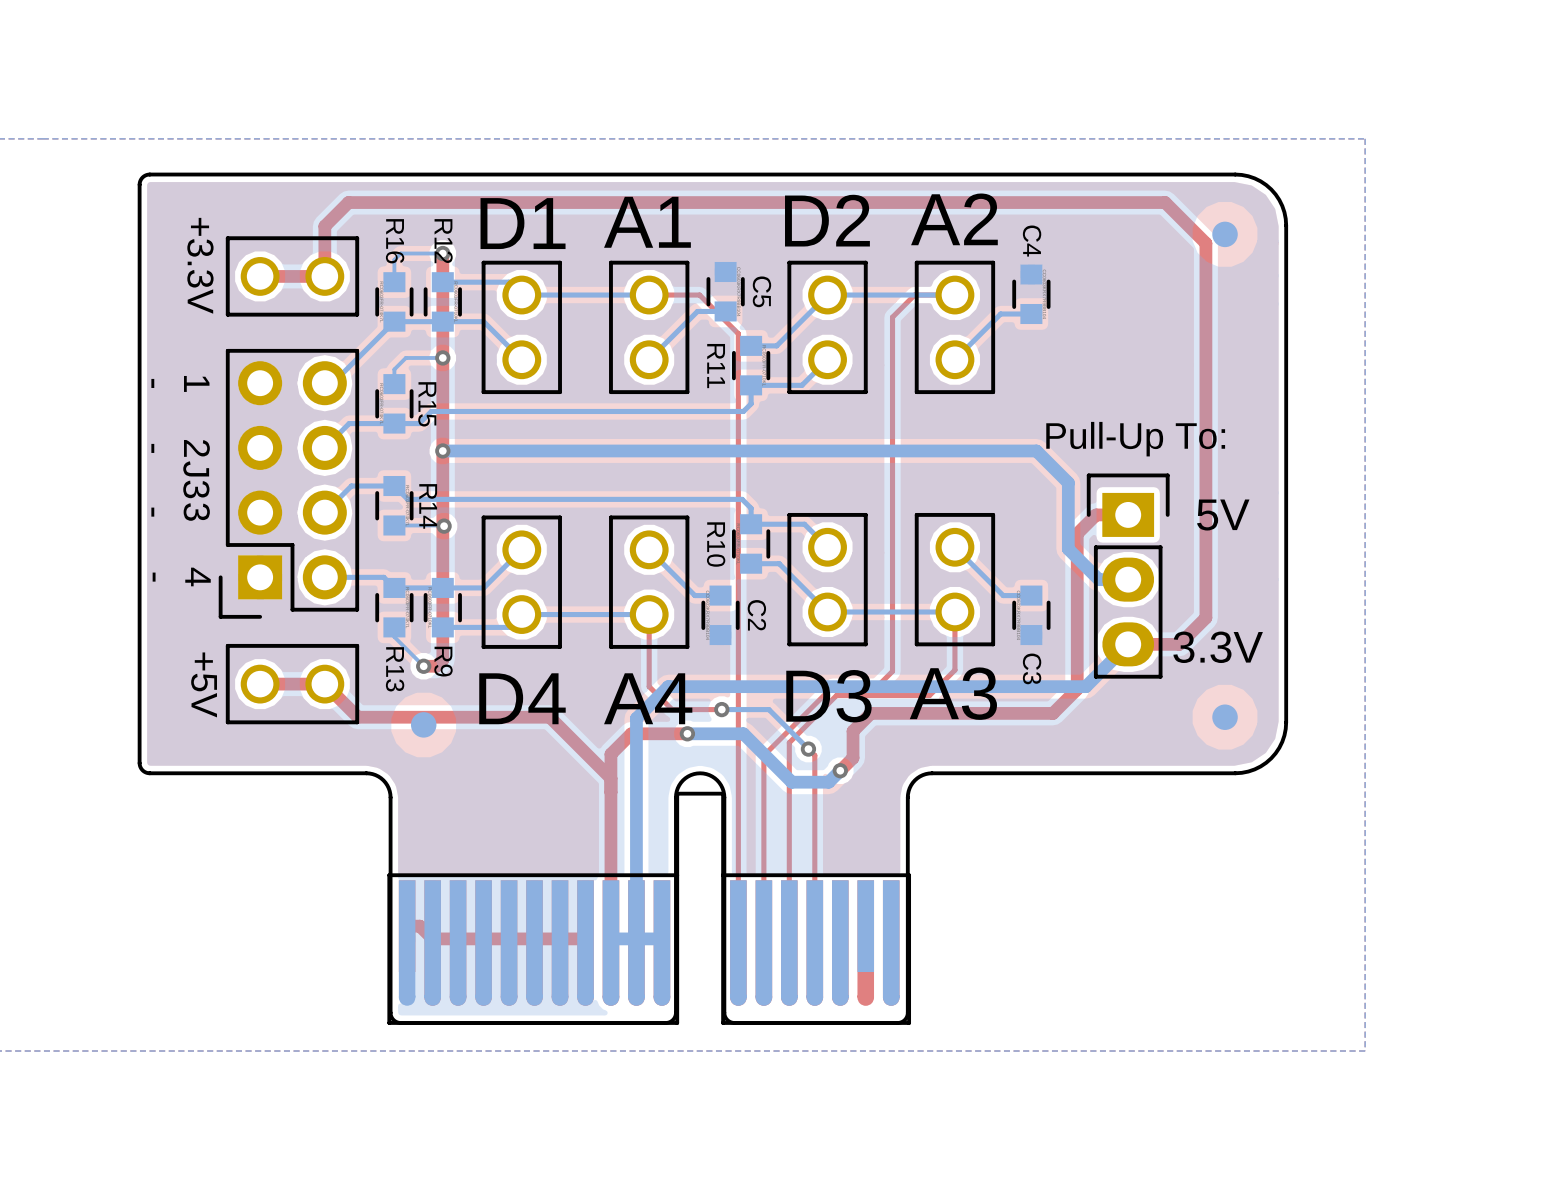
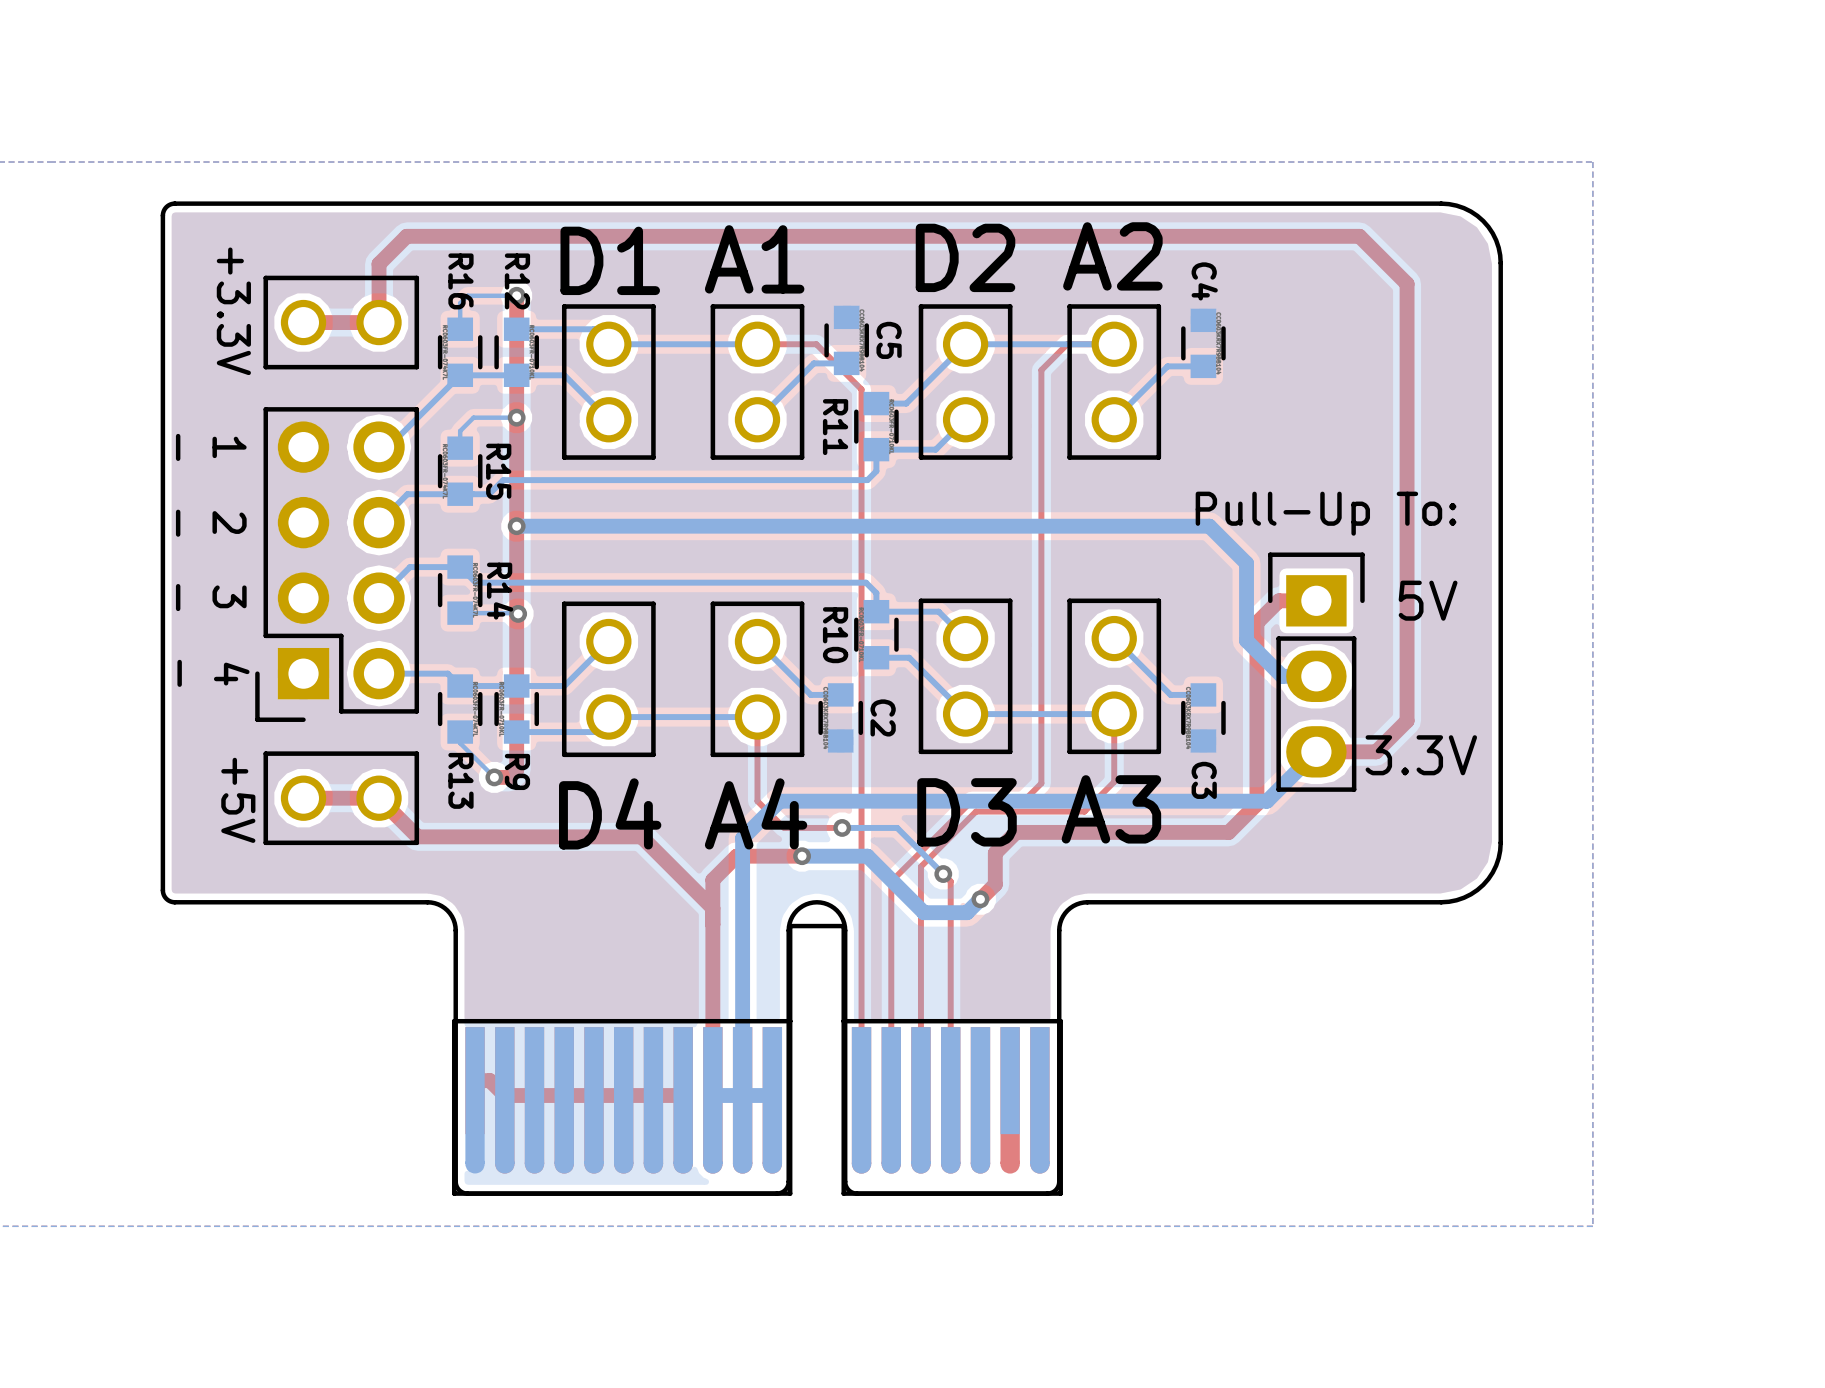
part: (1225, 234) -> none
J3 name: J3 (196, 479) -> none
part: (1225, 717) -> none
part: (423, 724) -> none

